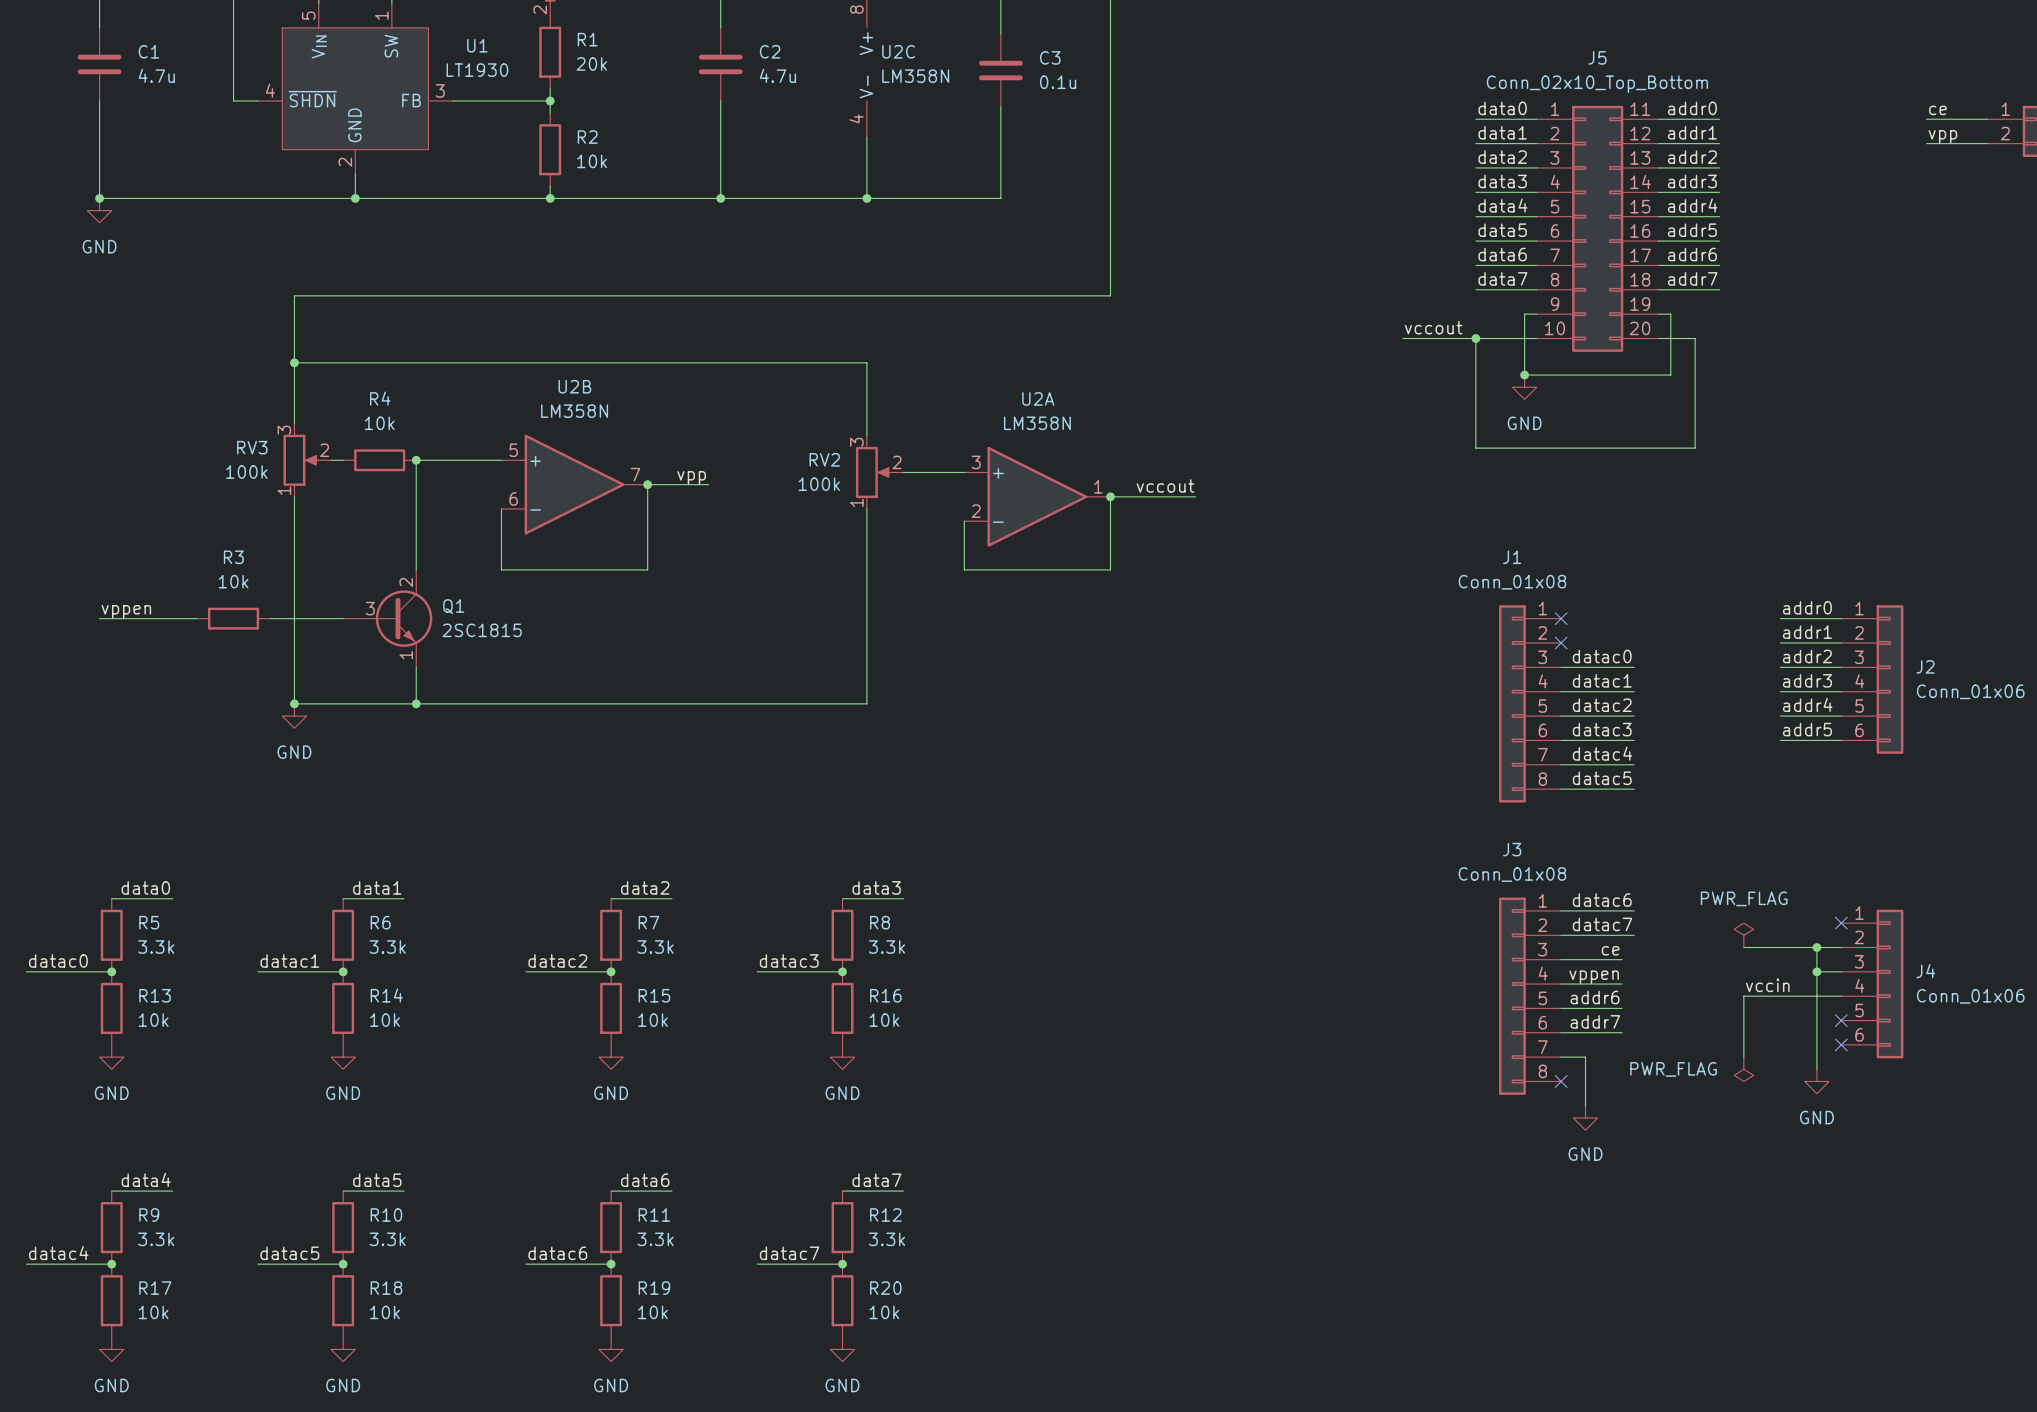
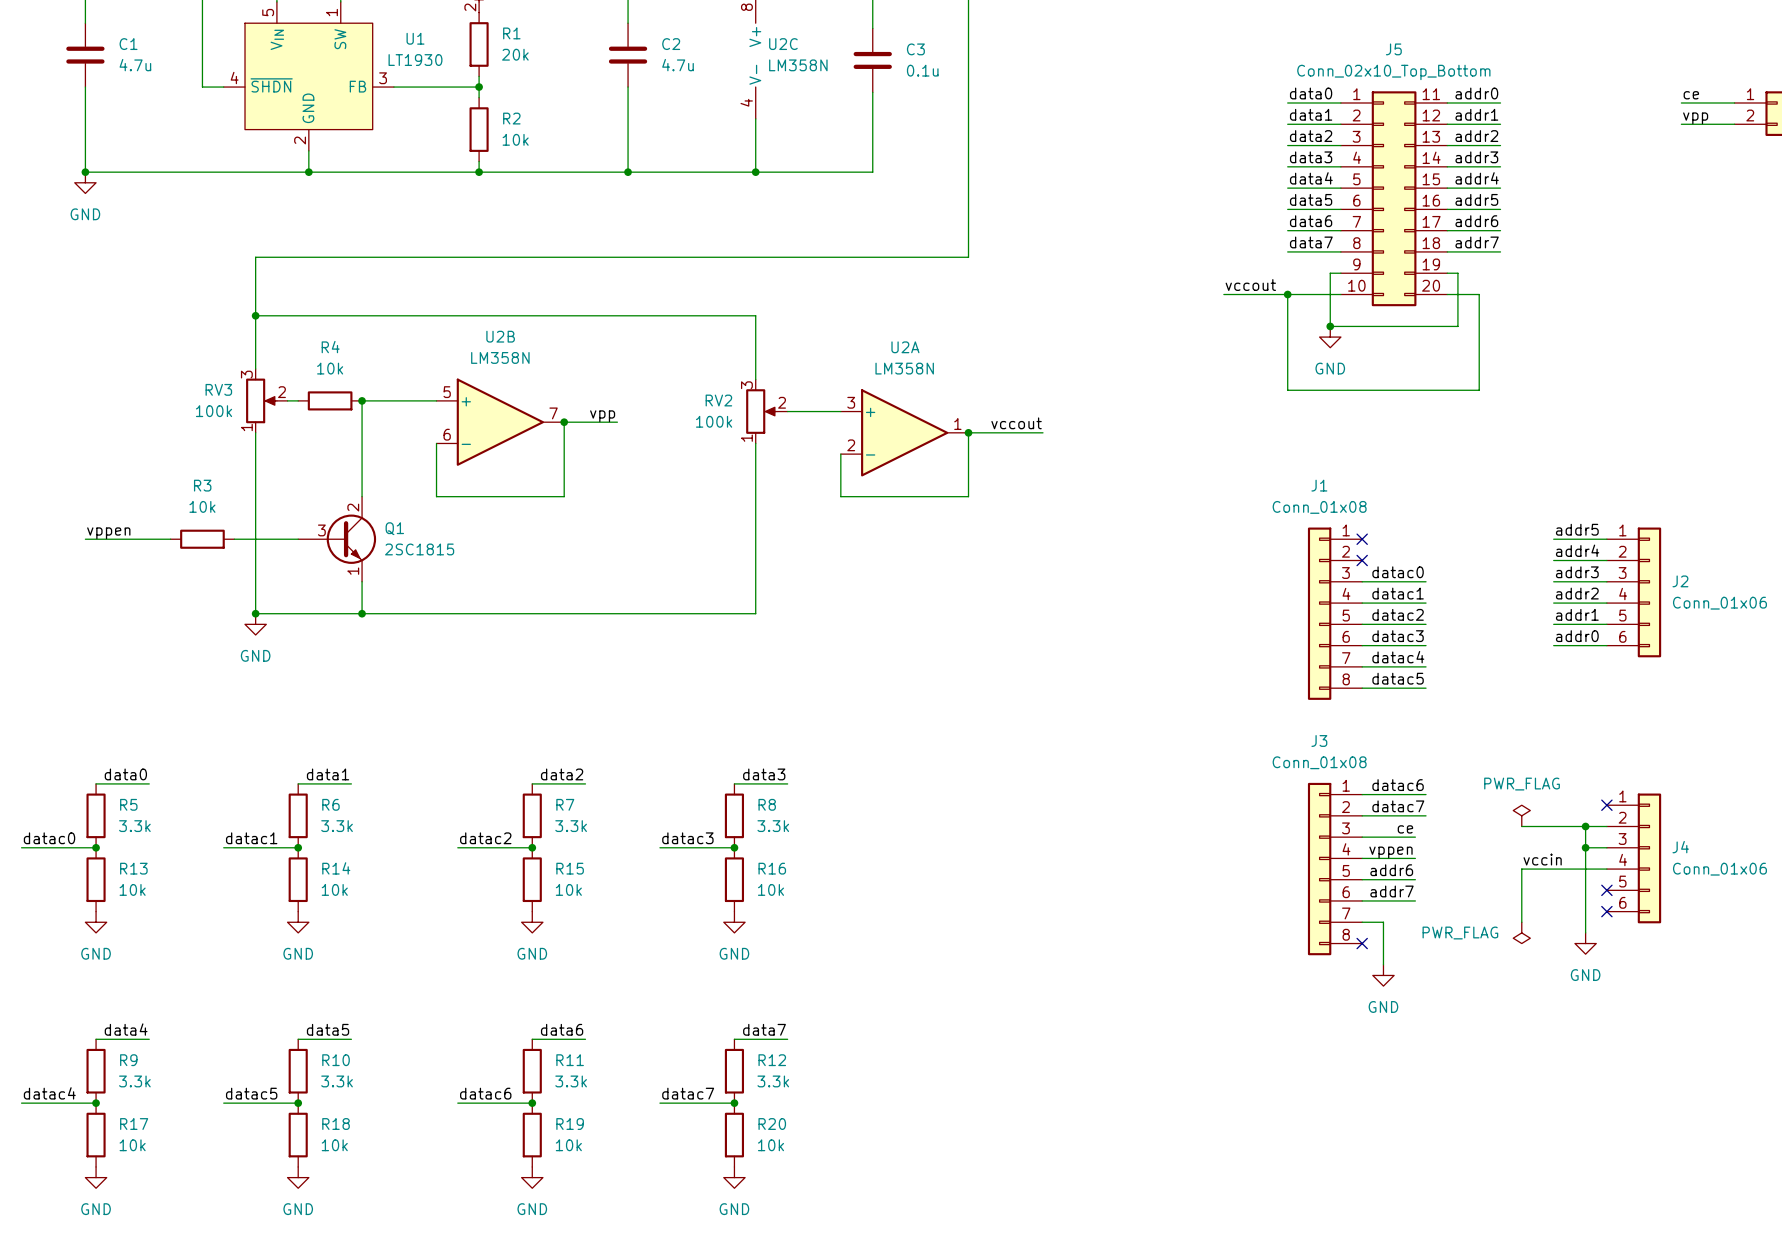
label: addr0 (1807, 607) -> addr5 (1577, 529)
label: addr1 (1807, 632) -> addr4 (1577, 550)
label: addr2 (1807, 656) -> addr3 (1577, 572)
label: addr3 (1807, 680) -> addr2 (1577, 593)
label: addr4 (1807, 704) -> addr1 (1577, 614)
label: addr5 (1807, 729) -> addr0 (1577, 636)

